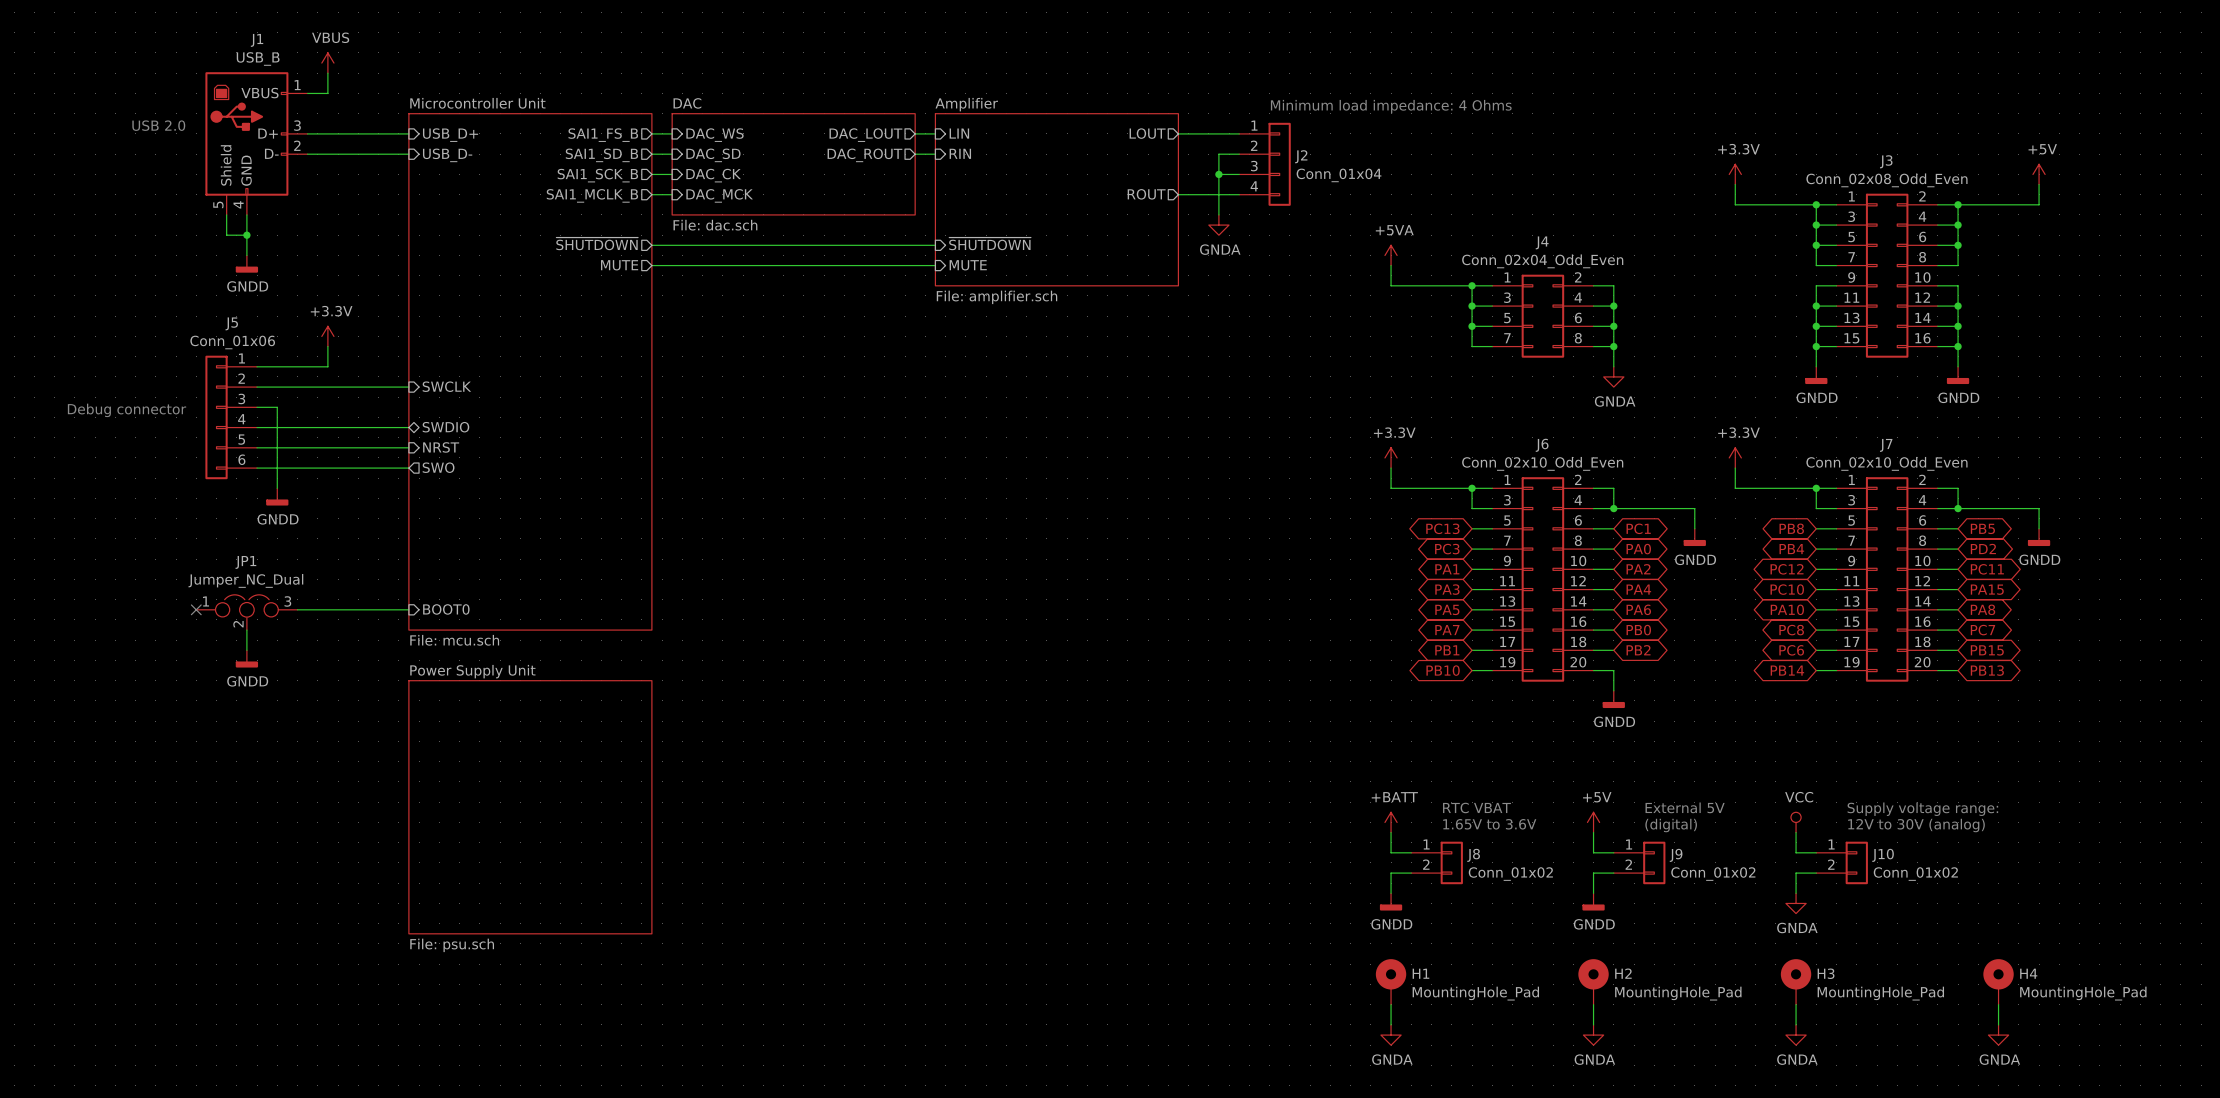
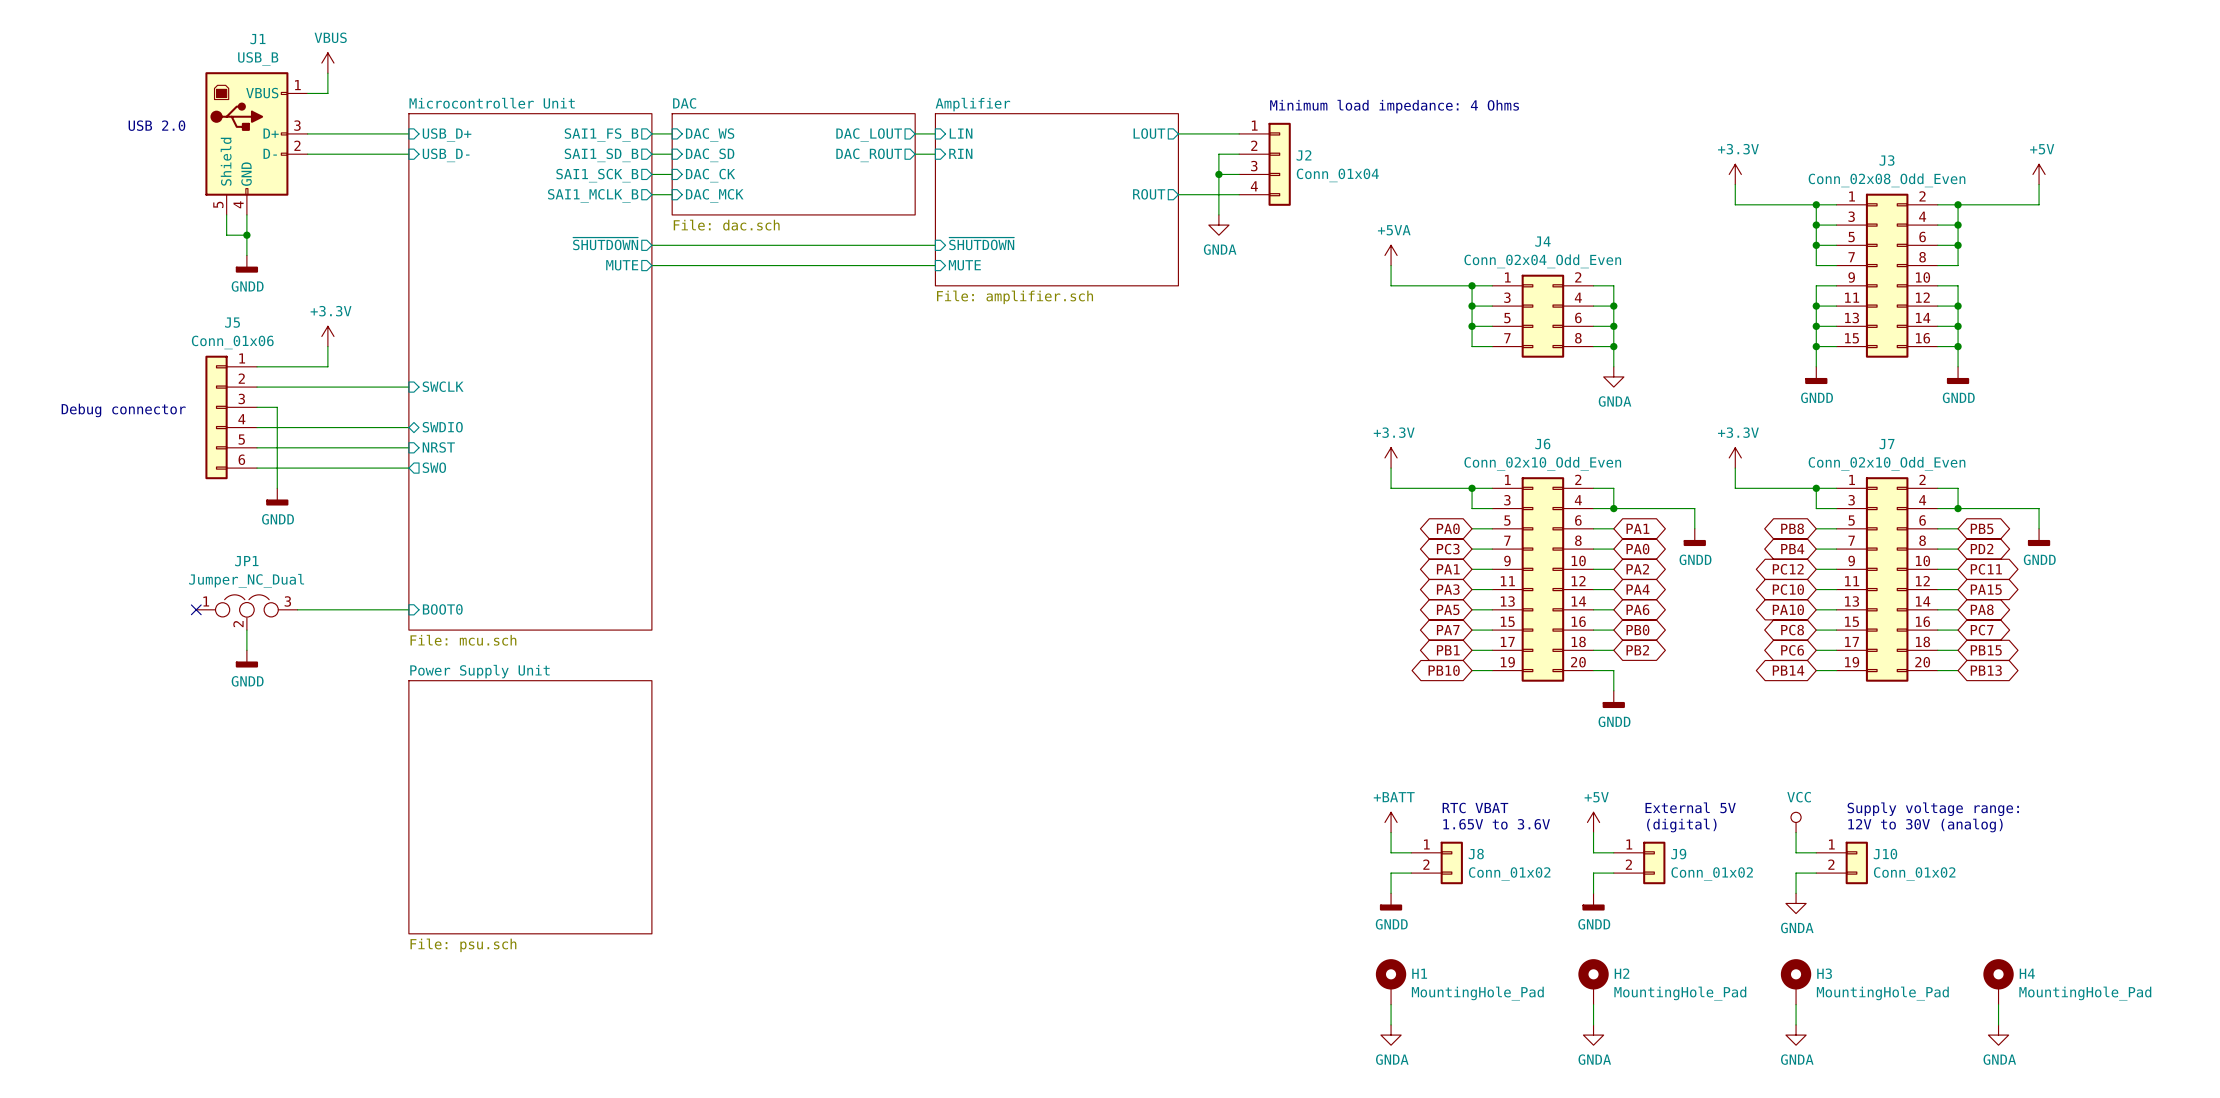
global label: PC13 (1442, 528) -> PA0 (1448, 528)
global label: PC1 (1638, 528) -> PA1 (1637, 528)

